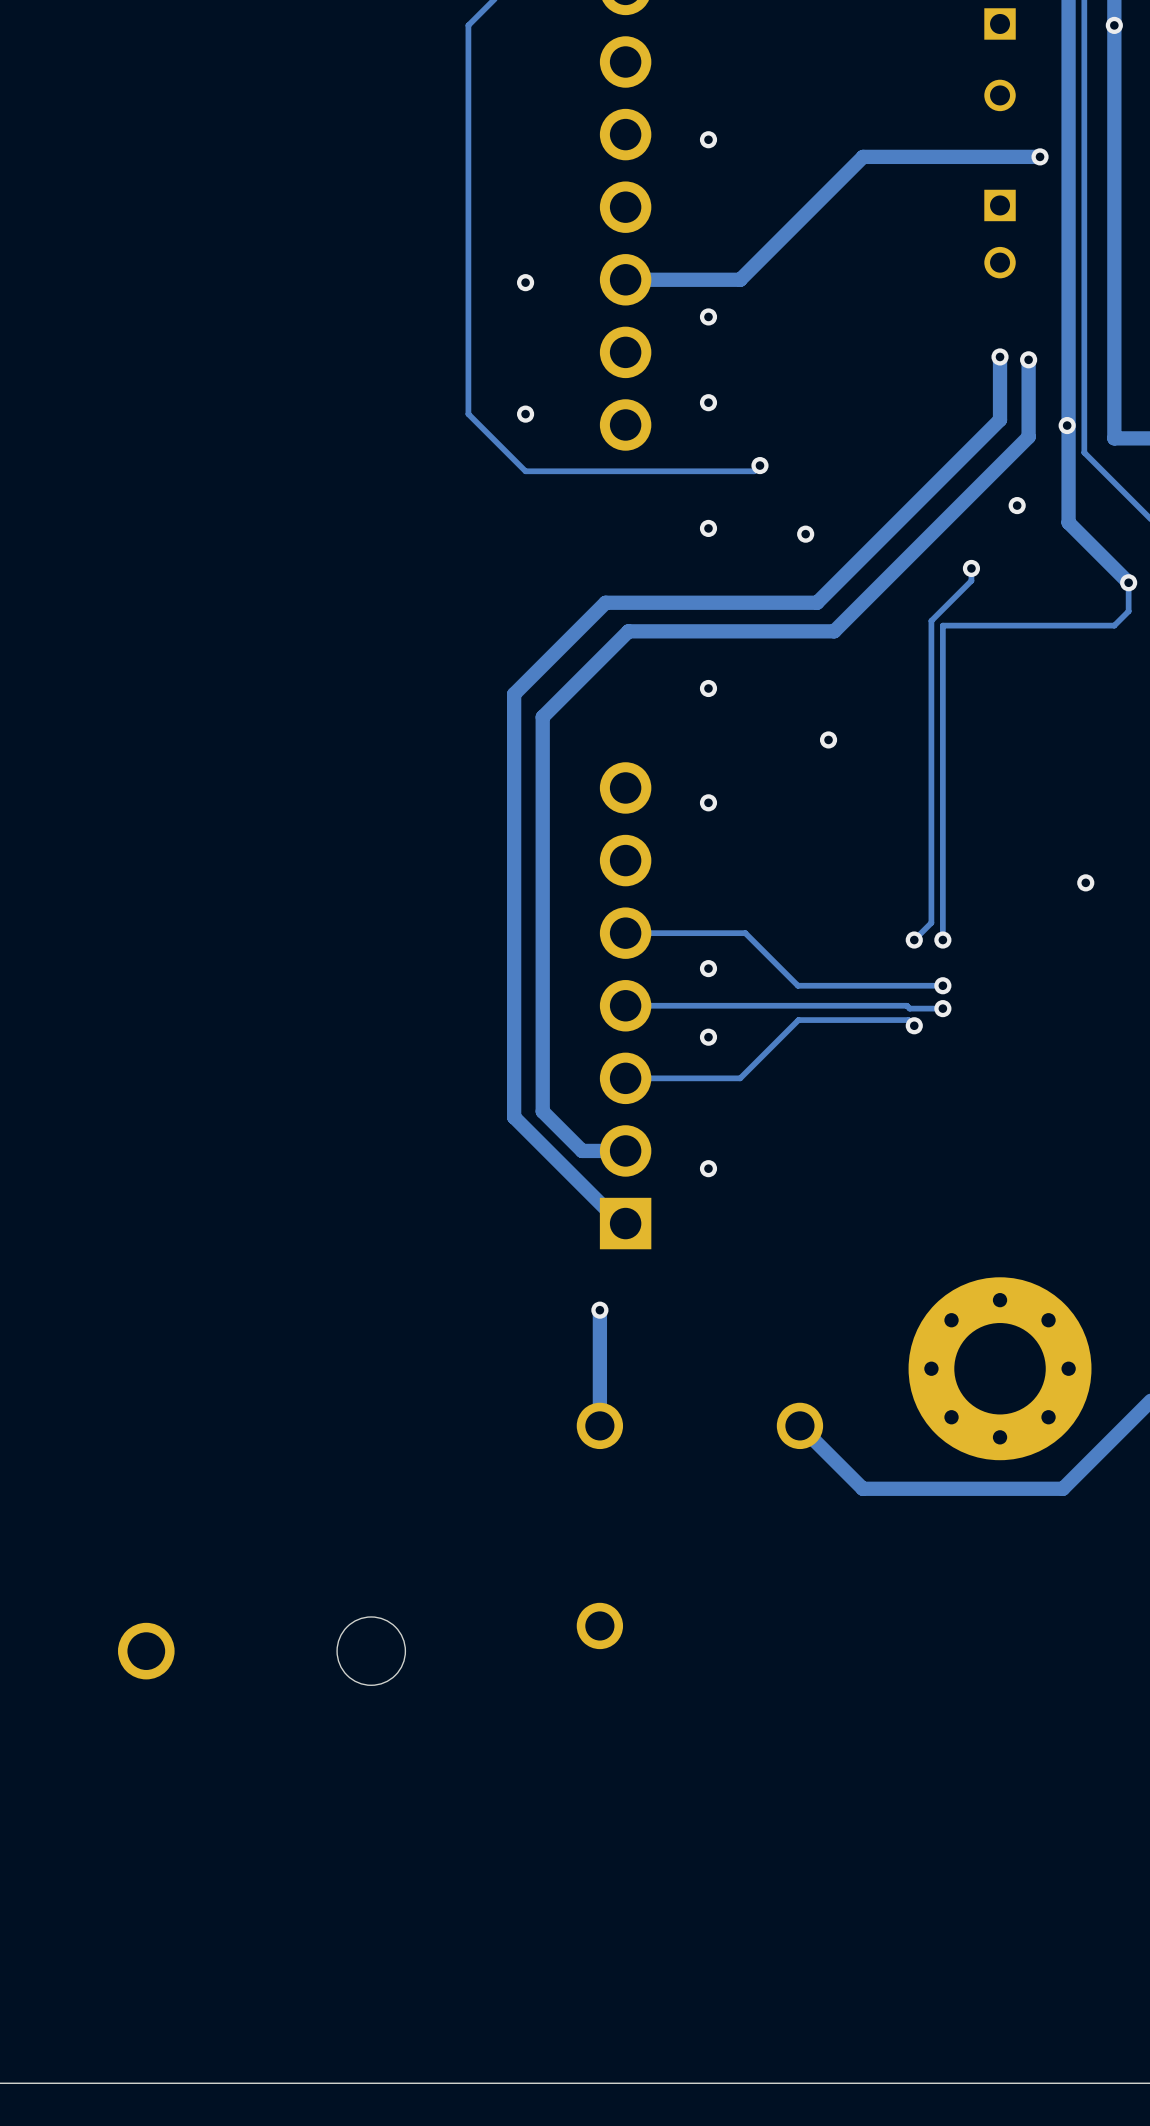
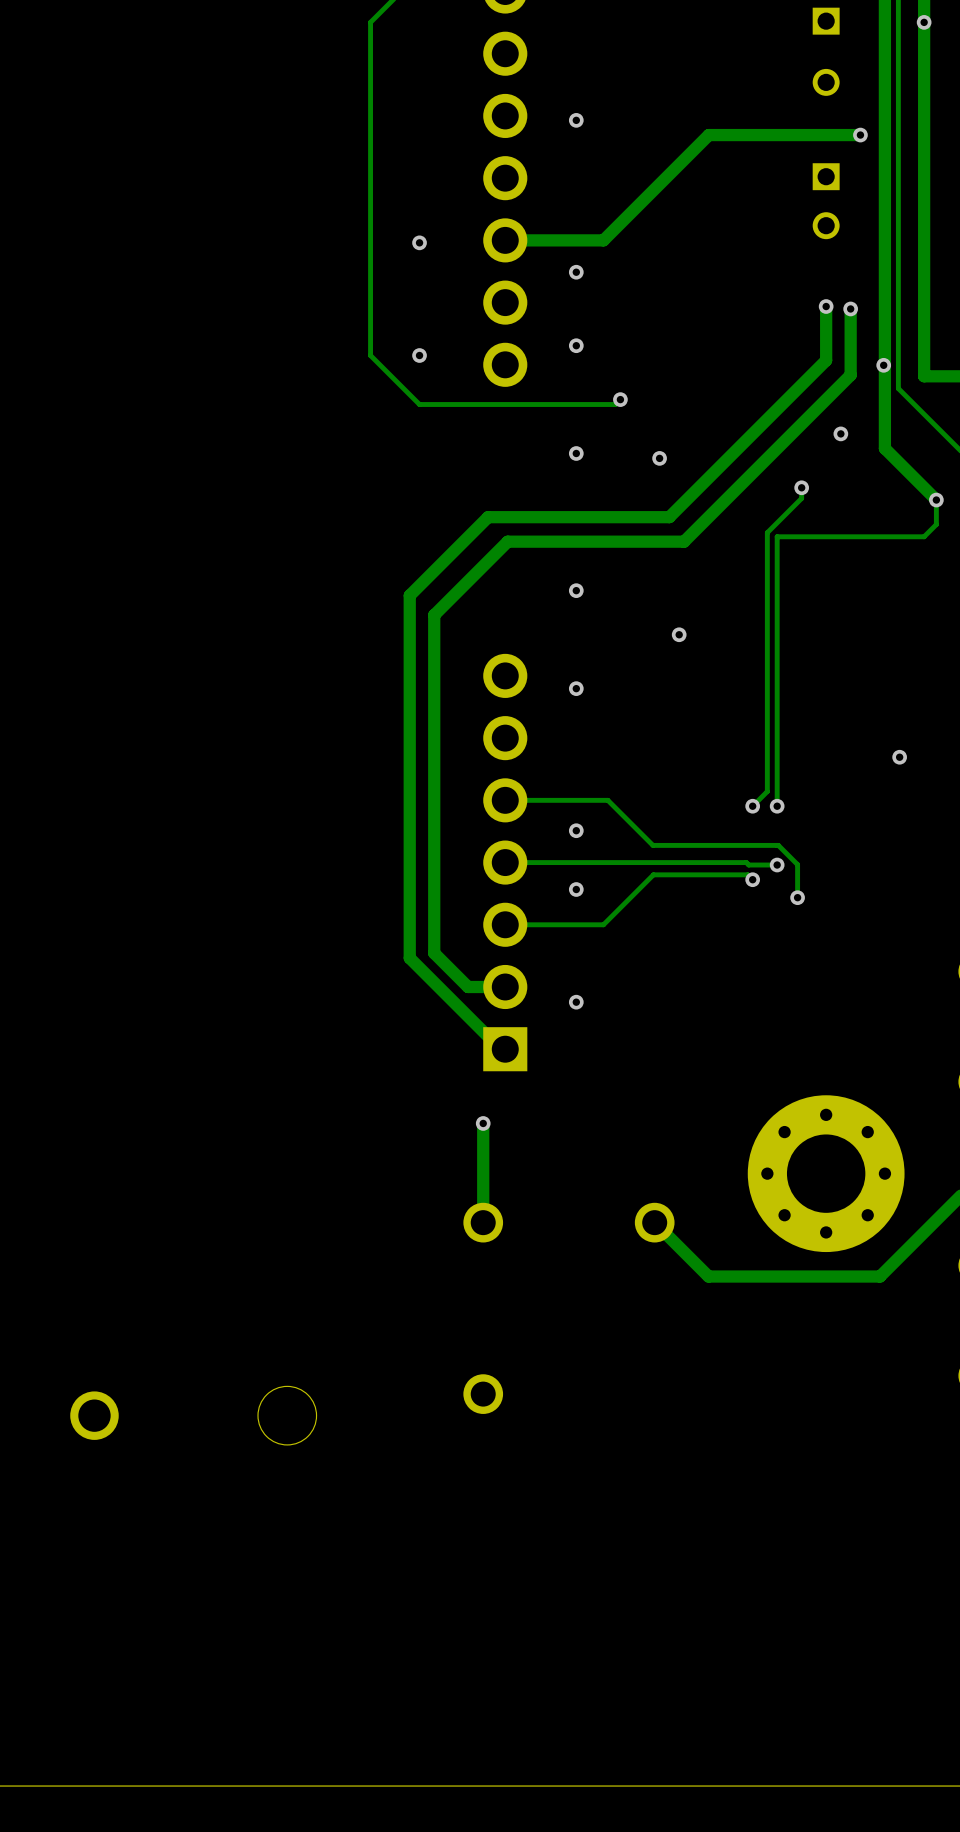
track: none -> (777, 845) (797, 864) (797, 897)
via position: (942, 985) -> (797, 897)

